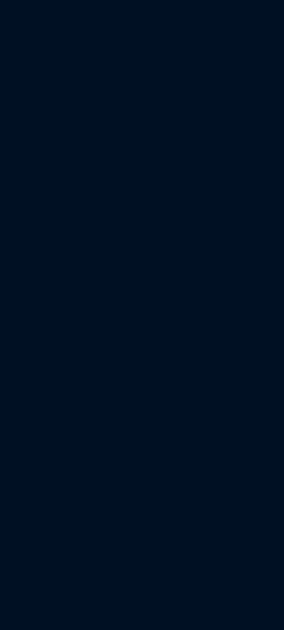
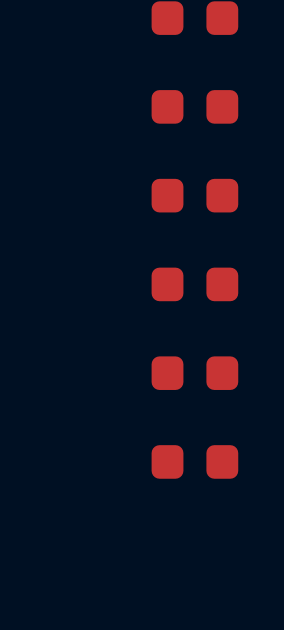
part: none -> (194, 18)
part: none -> (194, 106)
part: none -> (194, 195)
part: none -> (194, 284)
part: none -> (194, 373)
part: none -> (194, 461)

